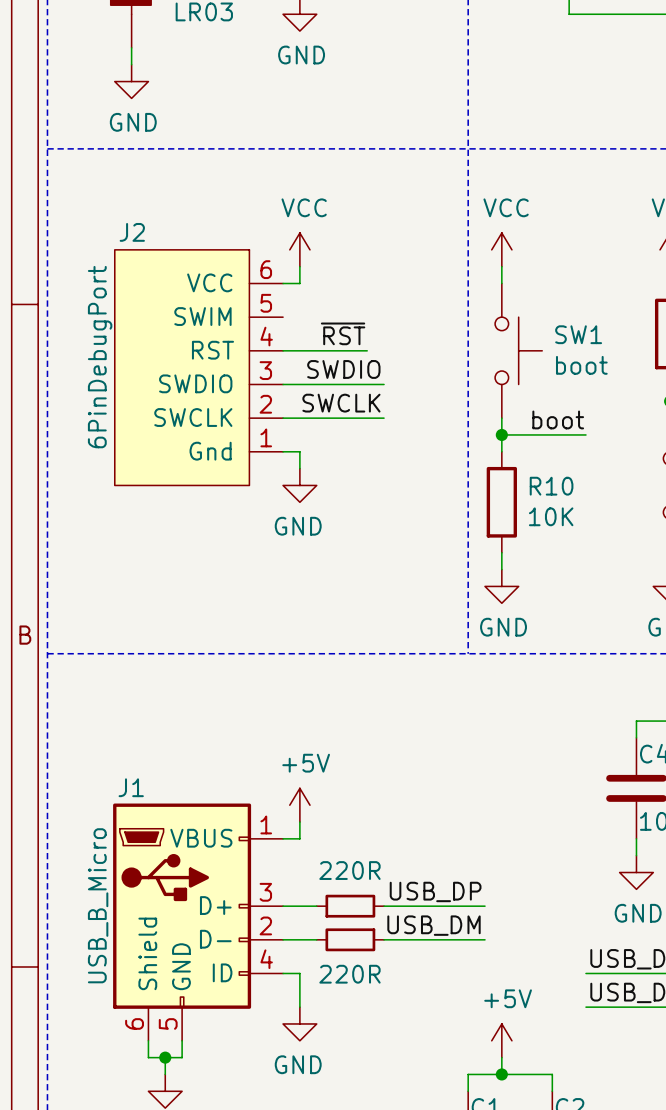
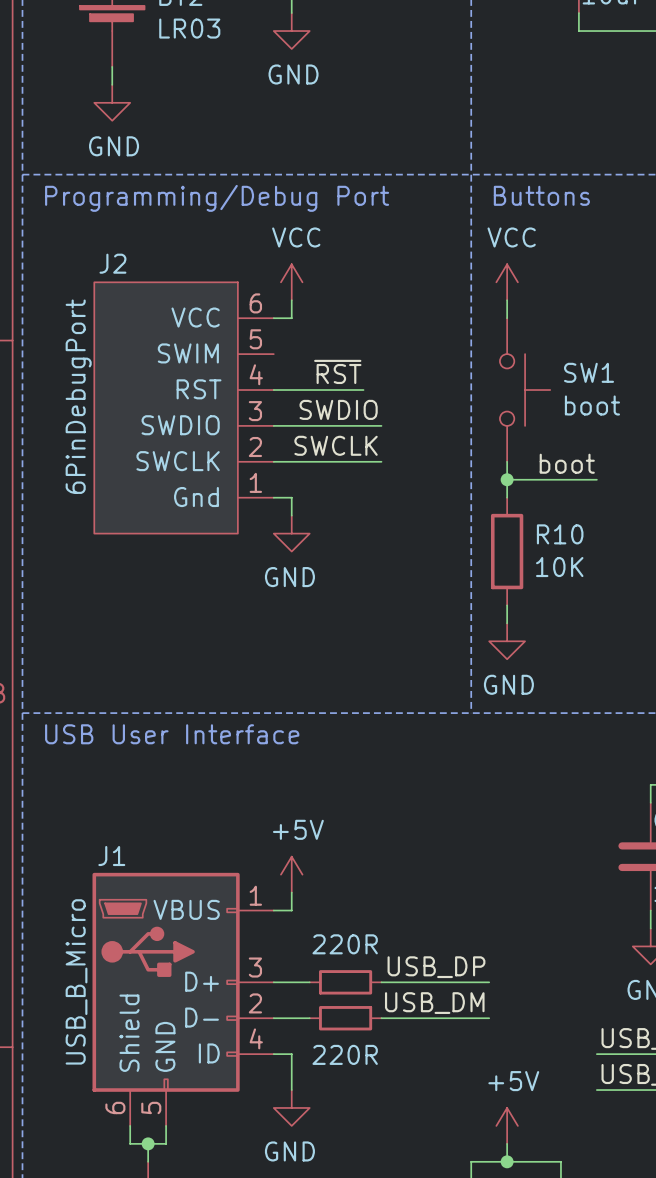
text: none -> Buttons (541, 195)
text: none -> Programming/Debug Port (217, 198)
text: none -> USB User Interface (172, 734)

